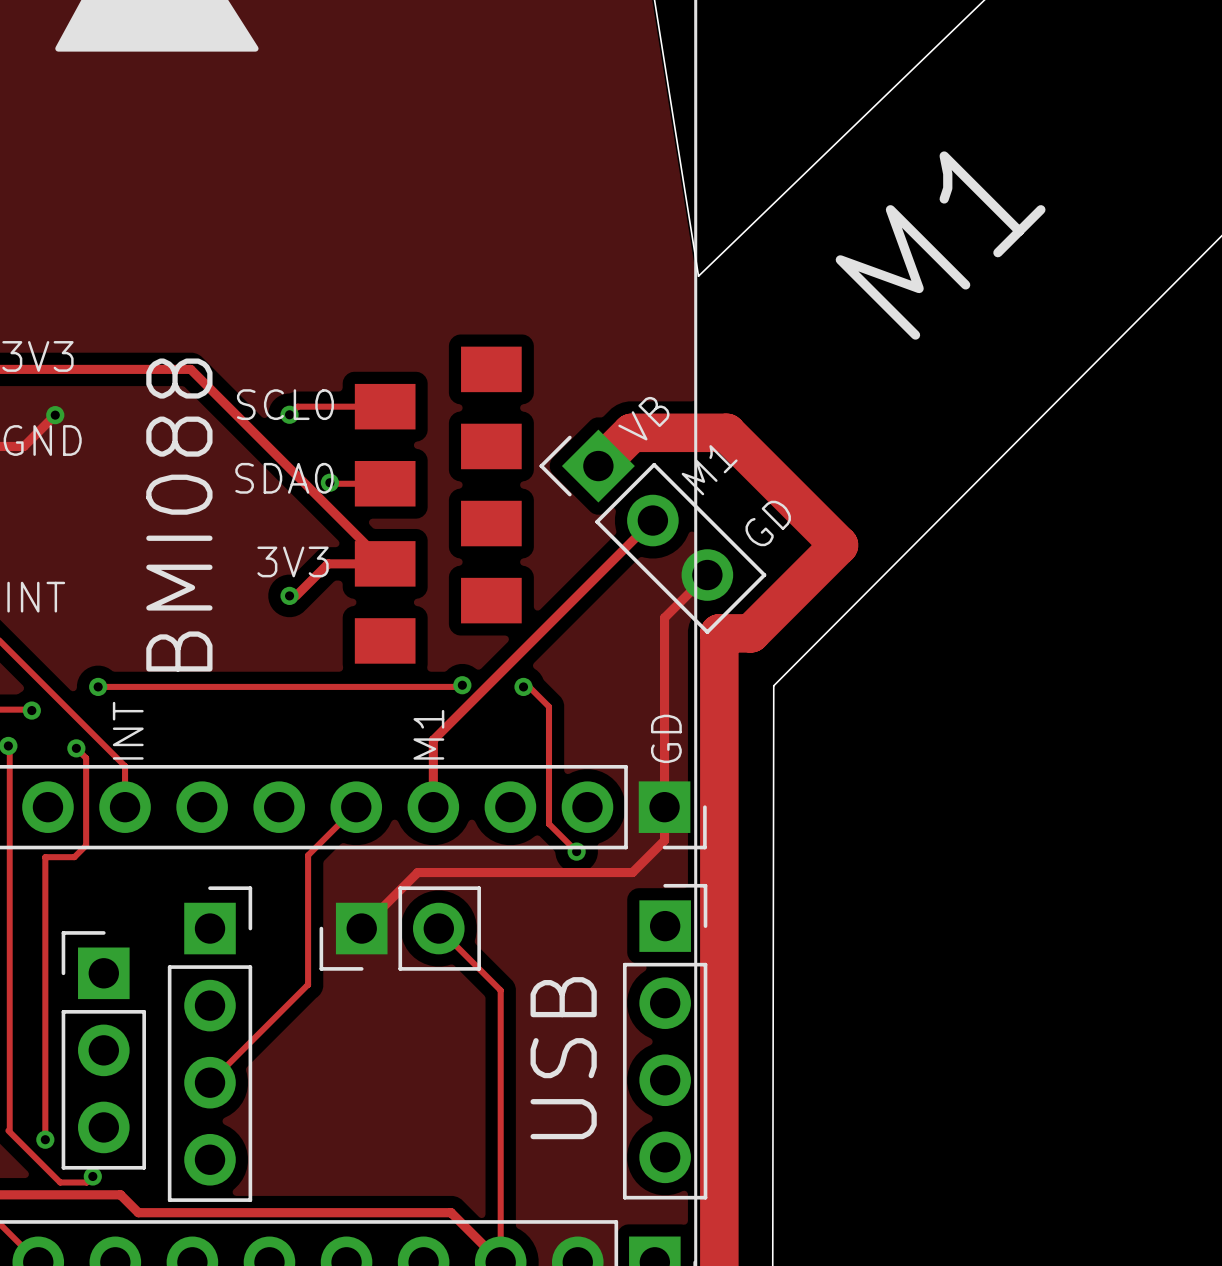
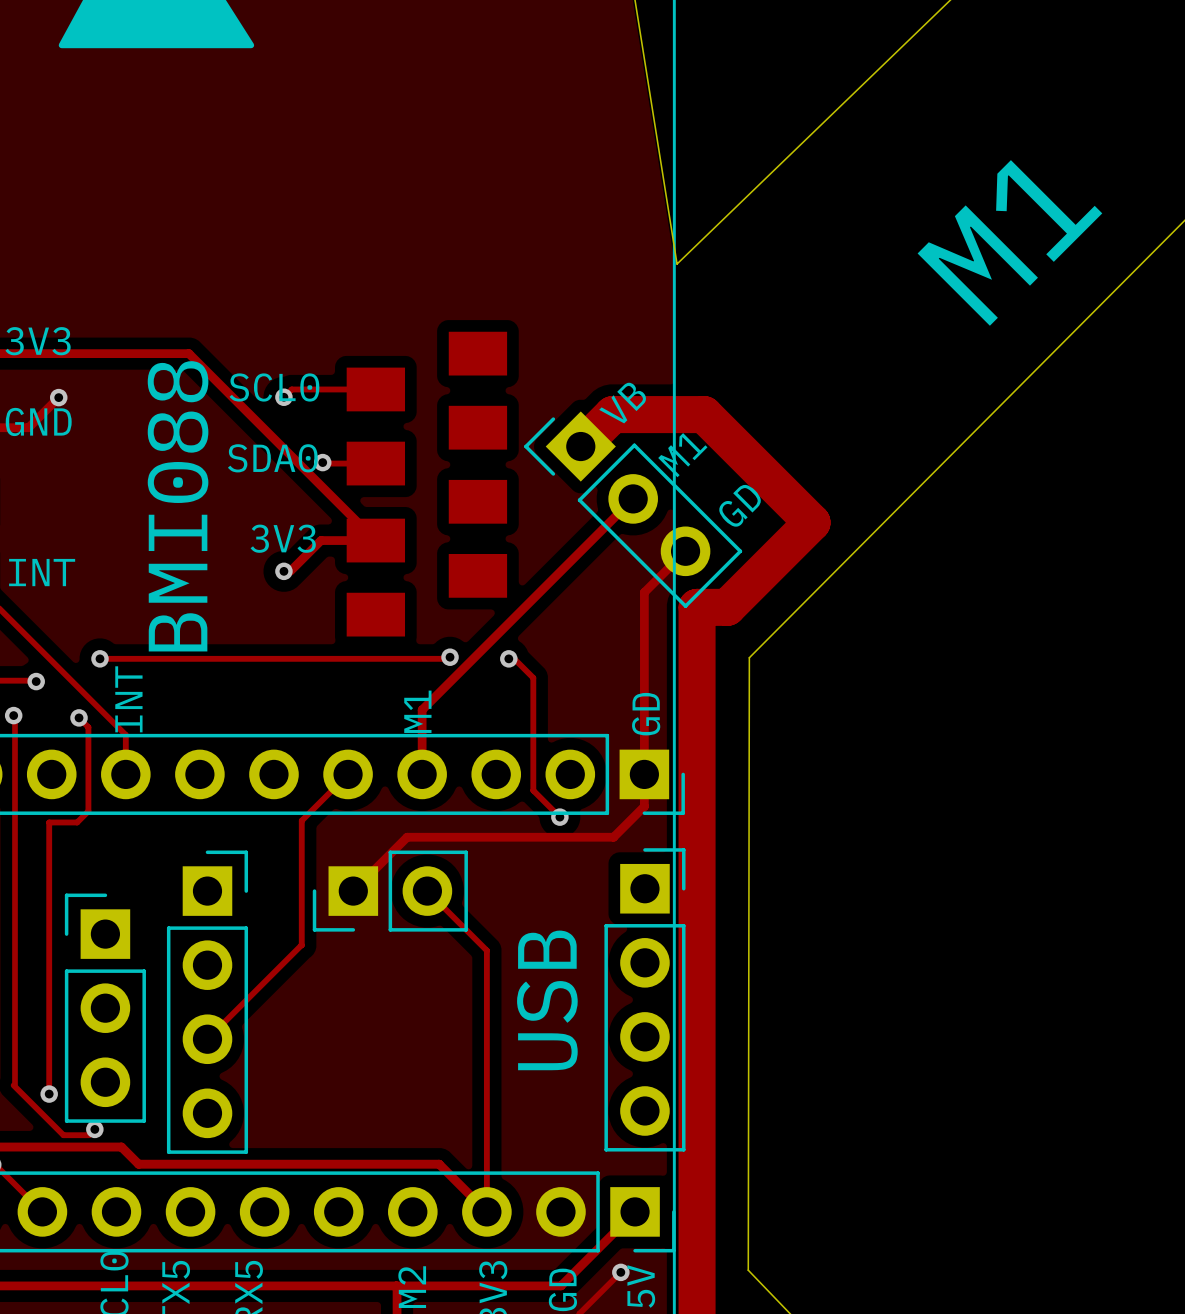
text position: M1 (940, 245) -> M1 (1009, 242)

